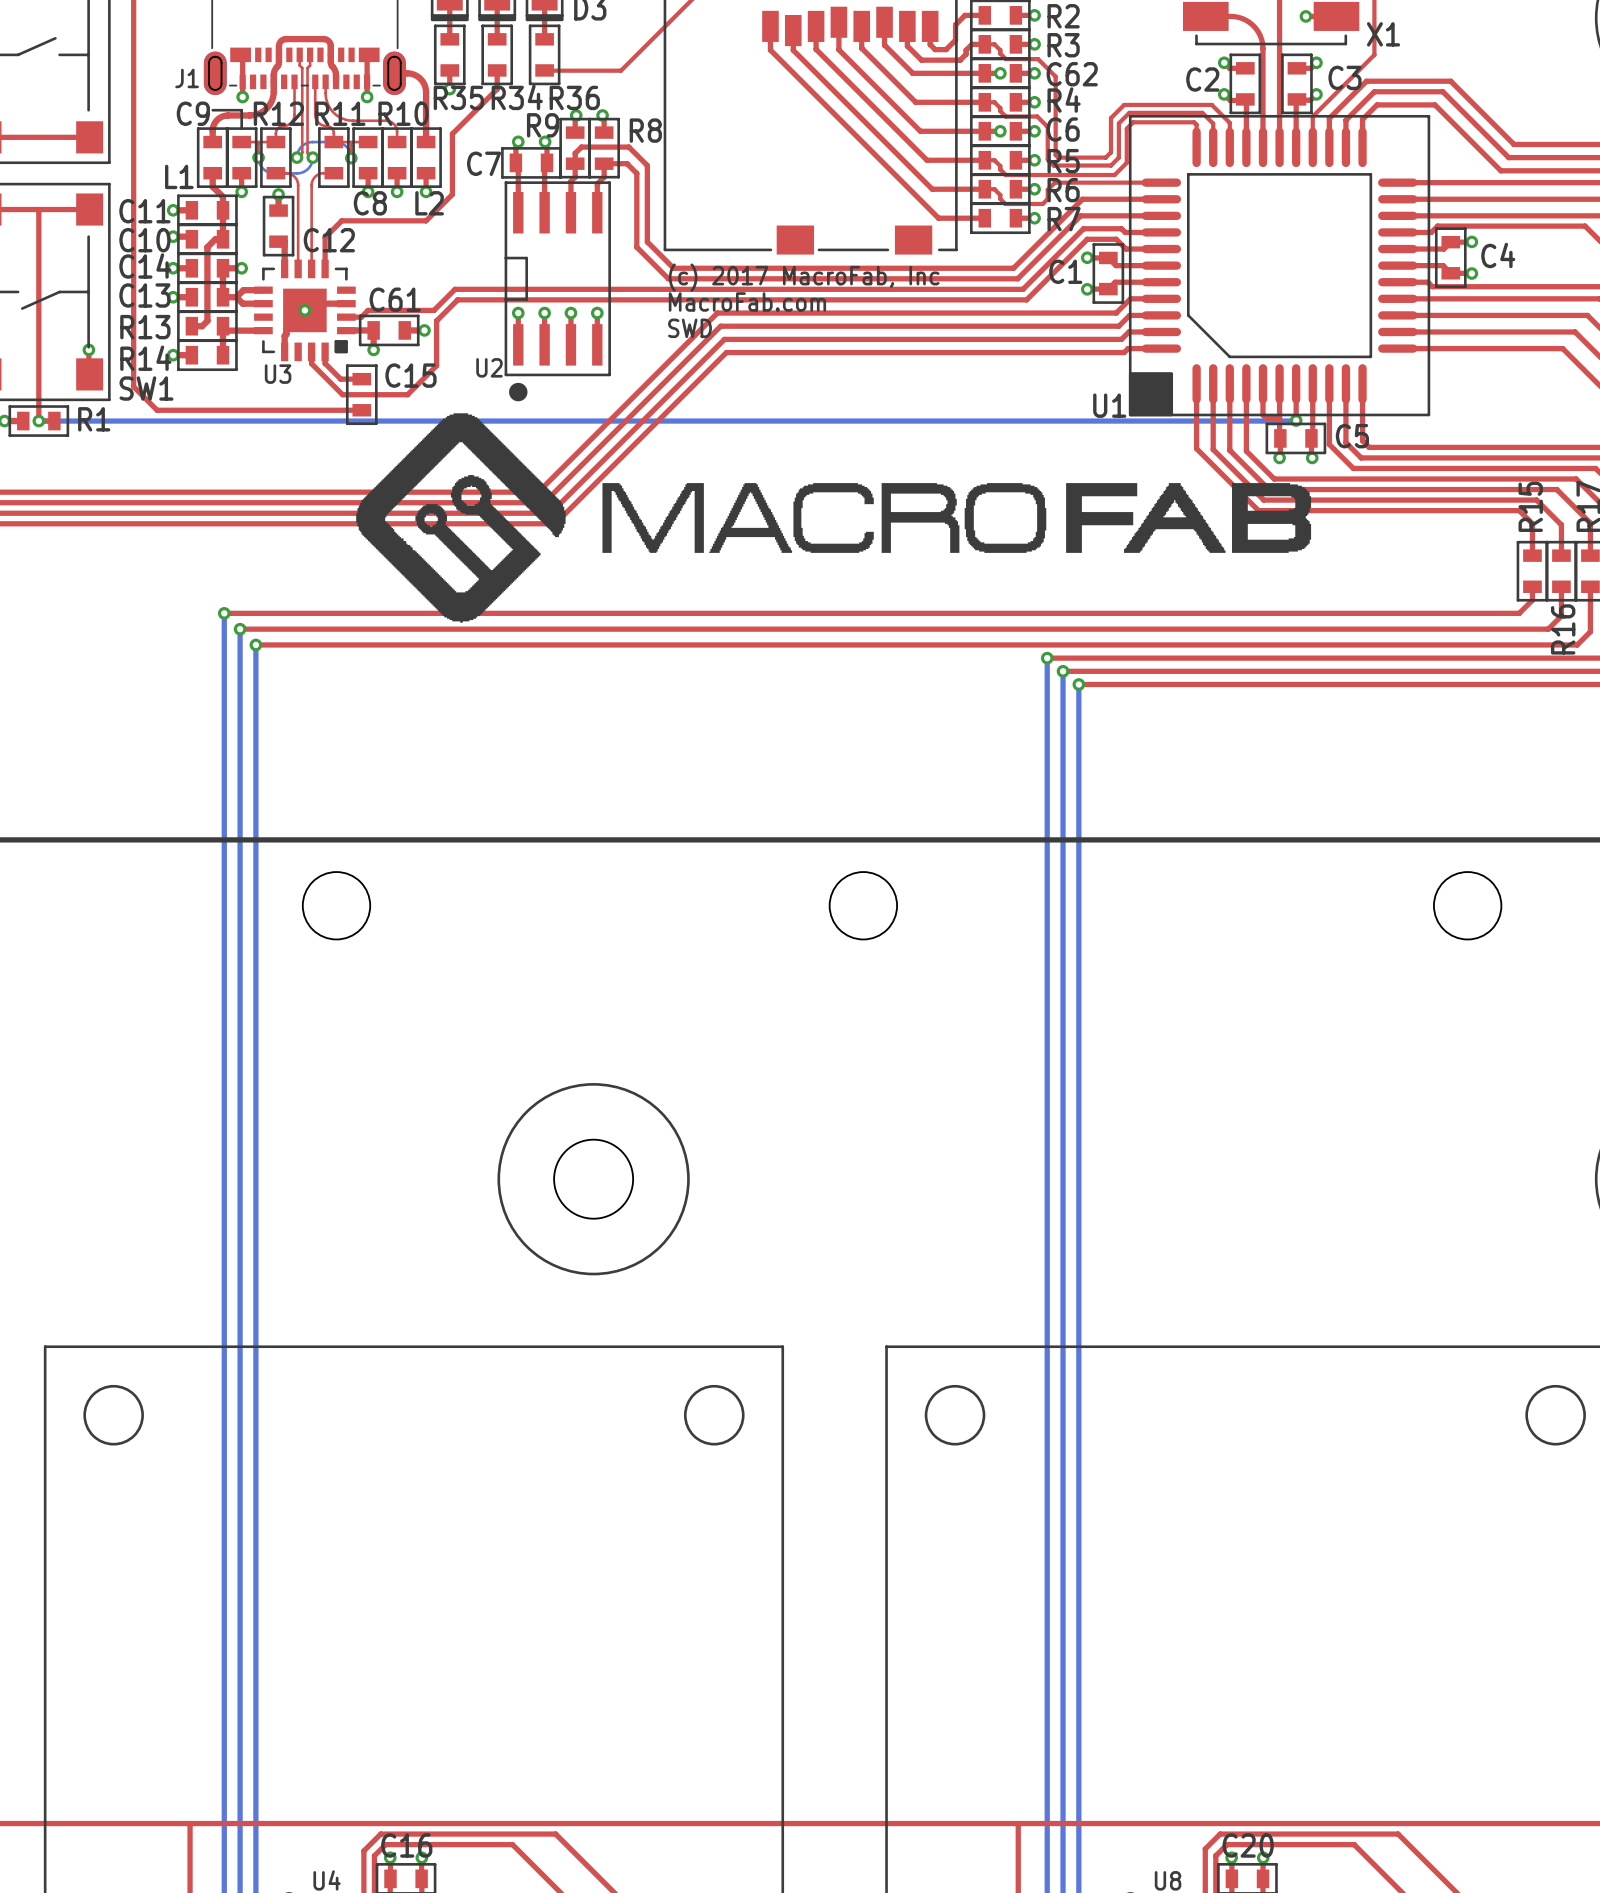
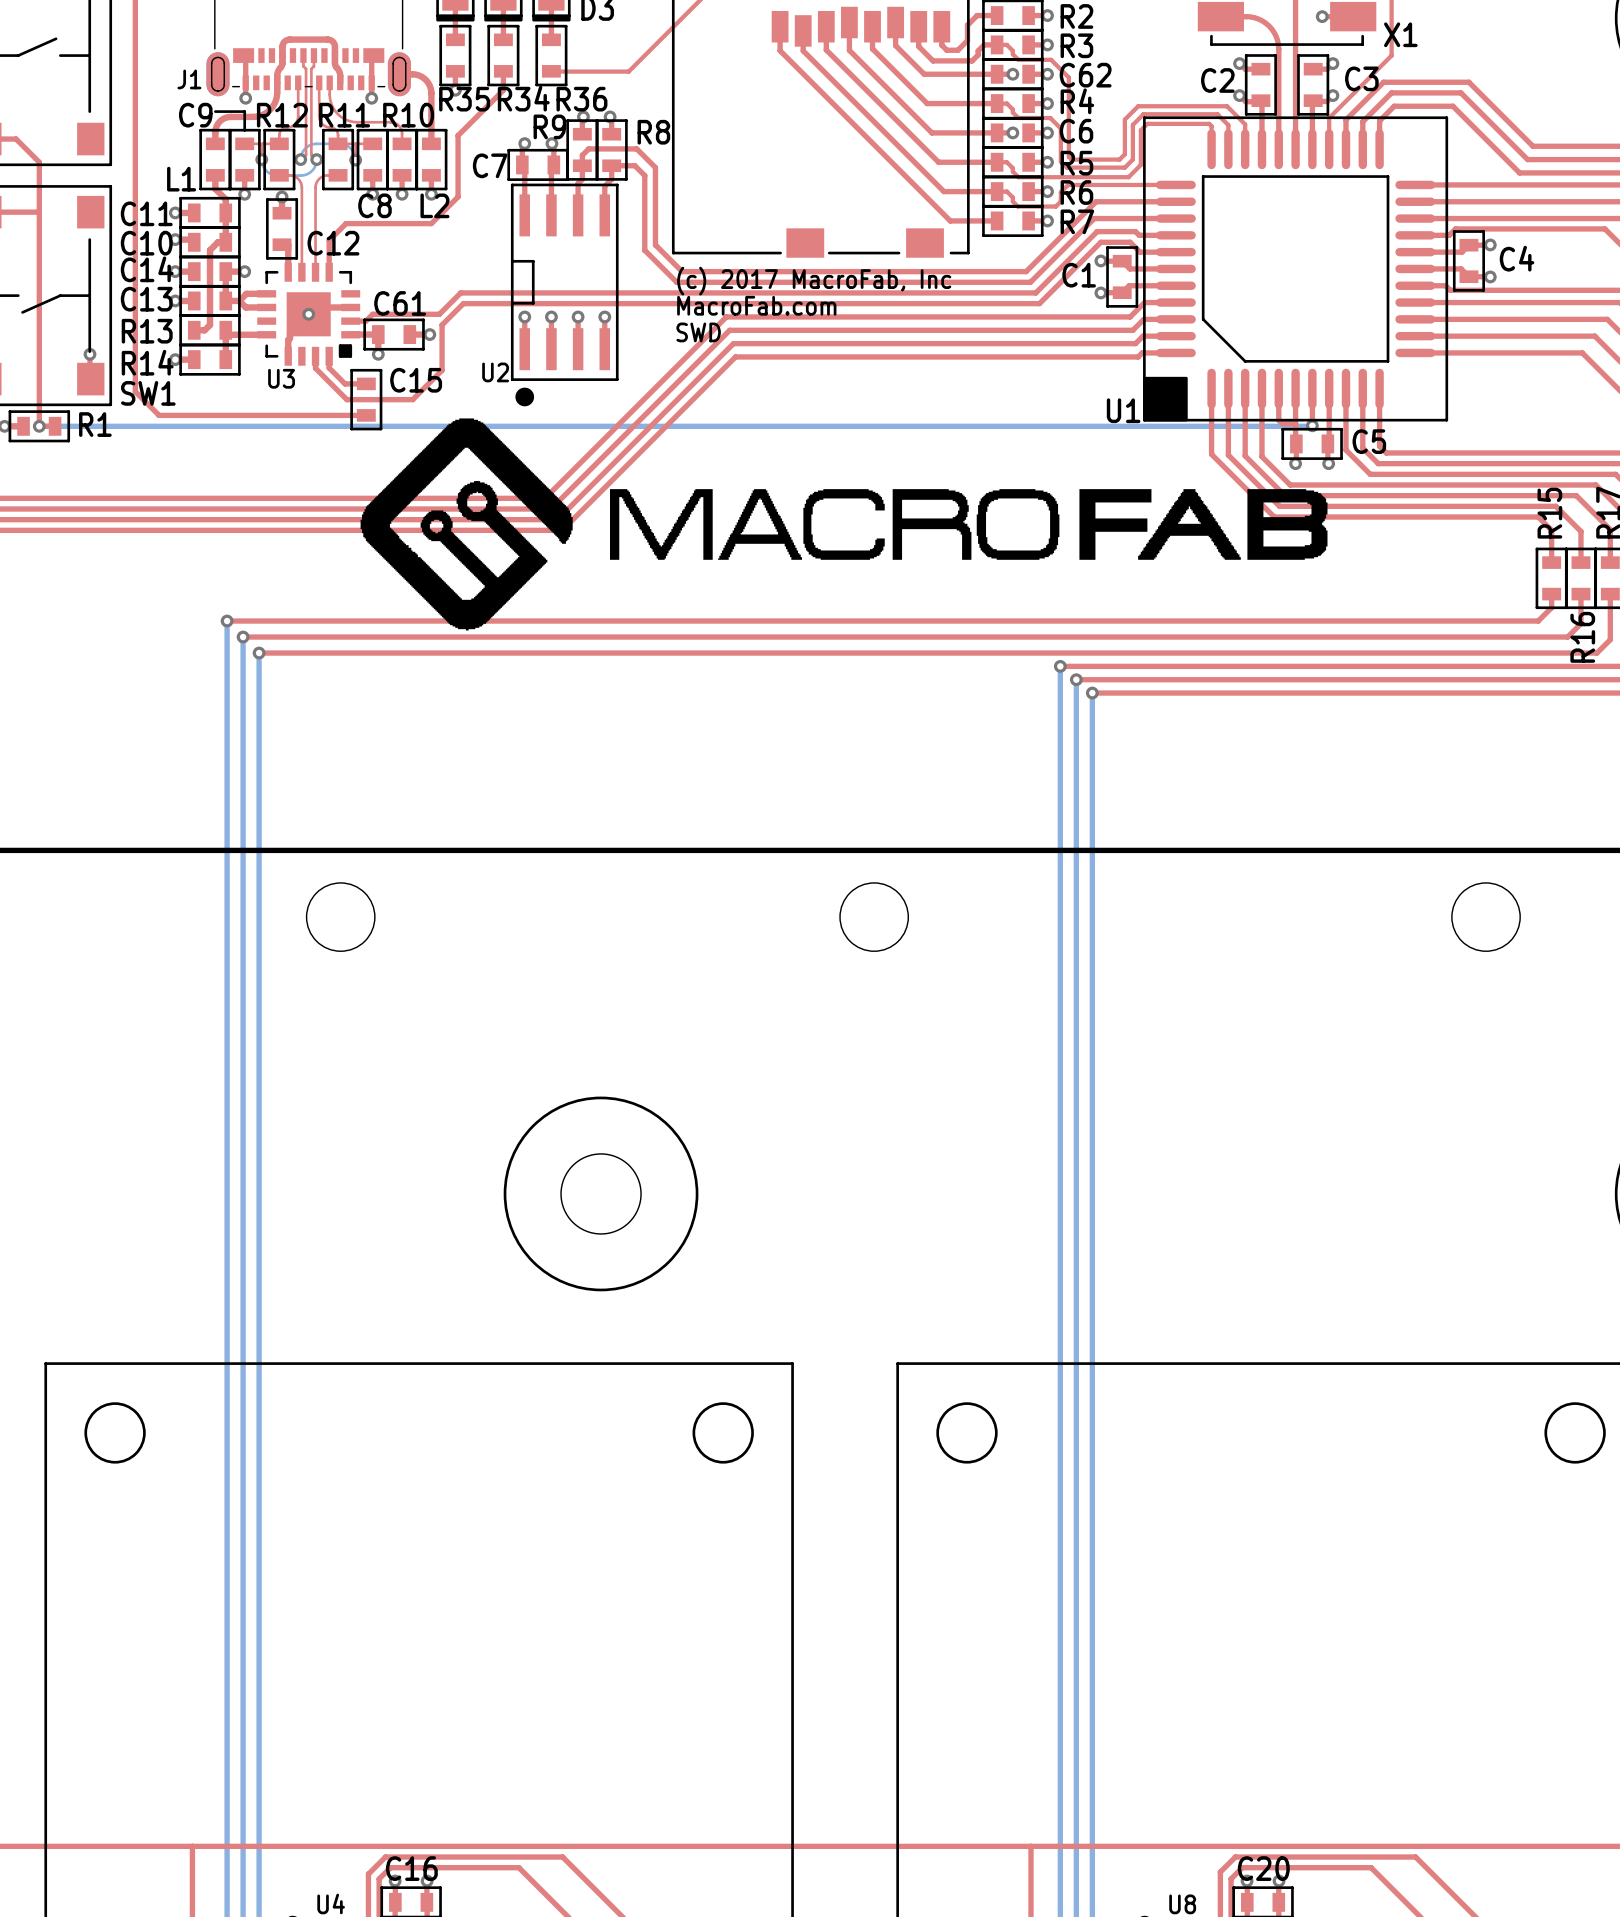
top track: (15, 137) (89, 137) -> (16, 139) (39, 162) (39, 212)
top track: (38, 209) (89, 209) -> none

